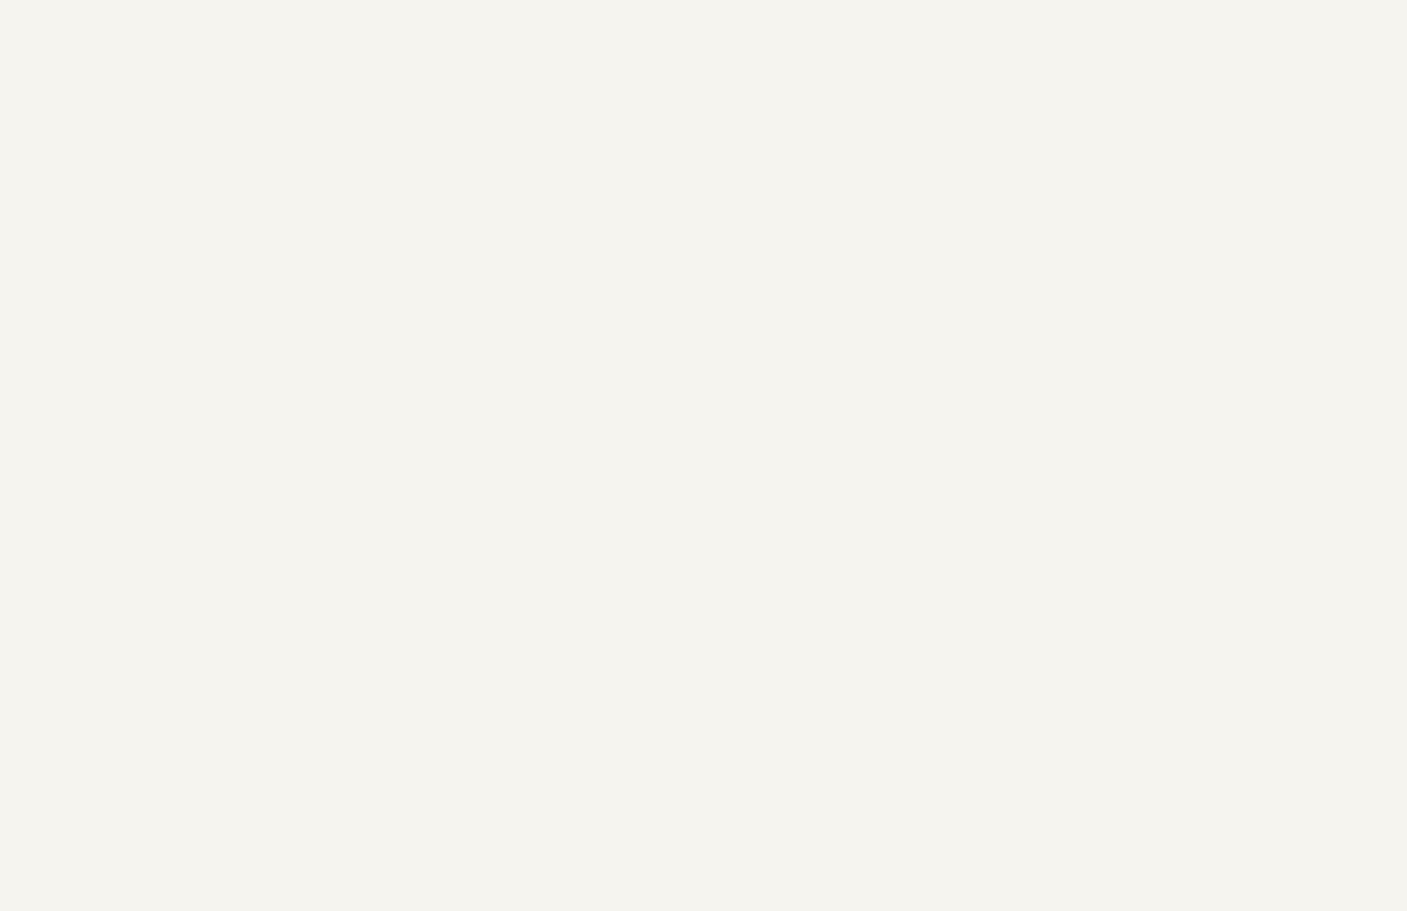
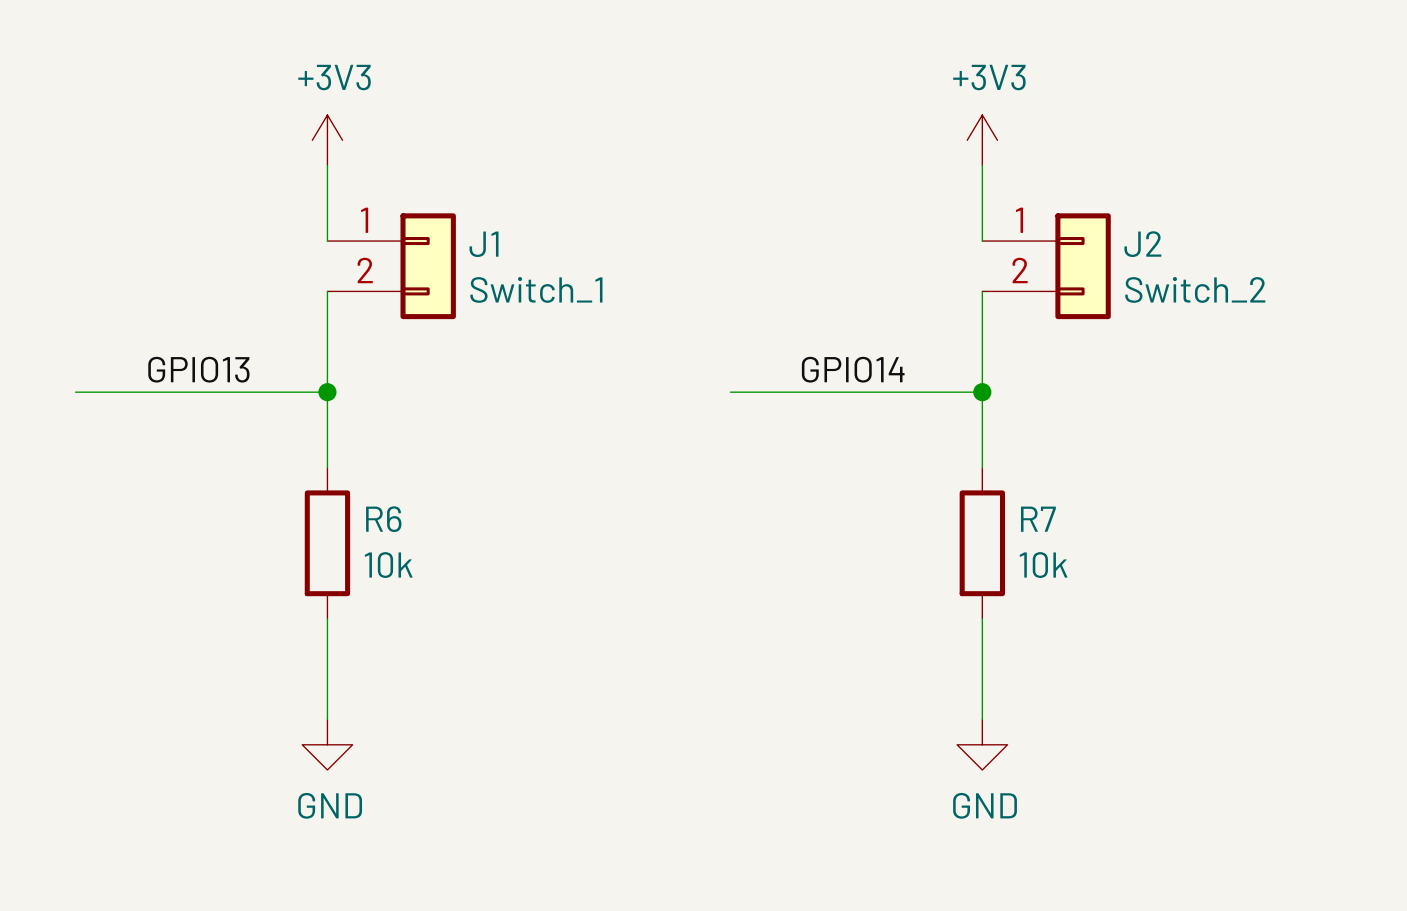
power symbol: none -> +3V3 (327, 140)
power symbol: none -> +3V3 (982, 140)
wire: none -> (327, 165) (327, 241)
wire: none -> (982, 165) (982, 241)
J1: none -> Switch_1 (391, 266)
J2: none -> Switch_2 (1046, 266)
wire: none -> (327, 291) (327, 467)
wire: none -> (982, 291) (982, 467)
label: none -> GPIO13 (198, 369)
label: none -> GPIO14 (853, 369)
wire: none -> (75, 392) (327, 392)
junction: none -> (327, 392)
wire: none -> (730, 392) (982, 392)
junction: none -> (982, 392)
R6: none -> 10k (327, 543)
R7: none -> 10k (982, 543)
wire: none -> (327, 618) (327, 719)
wire: none -> (982, 618) (982, 719)
power symbol: none -> GND (327, 744)
power symbol: none -> GND (982, 744)

